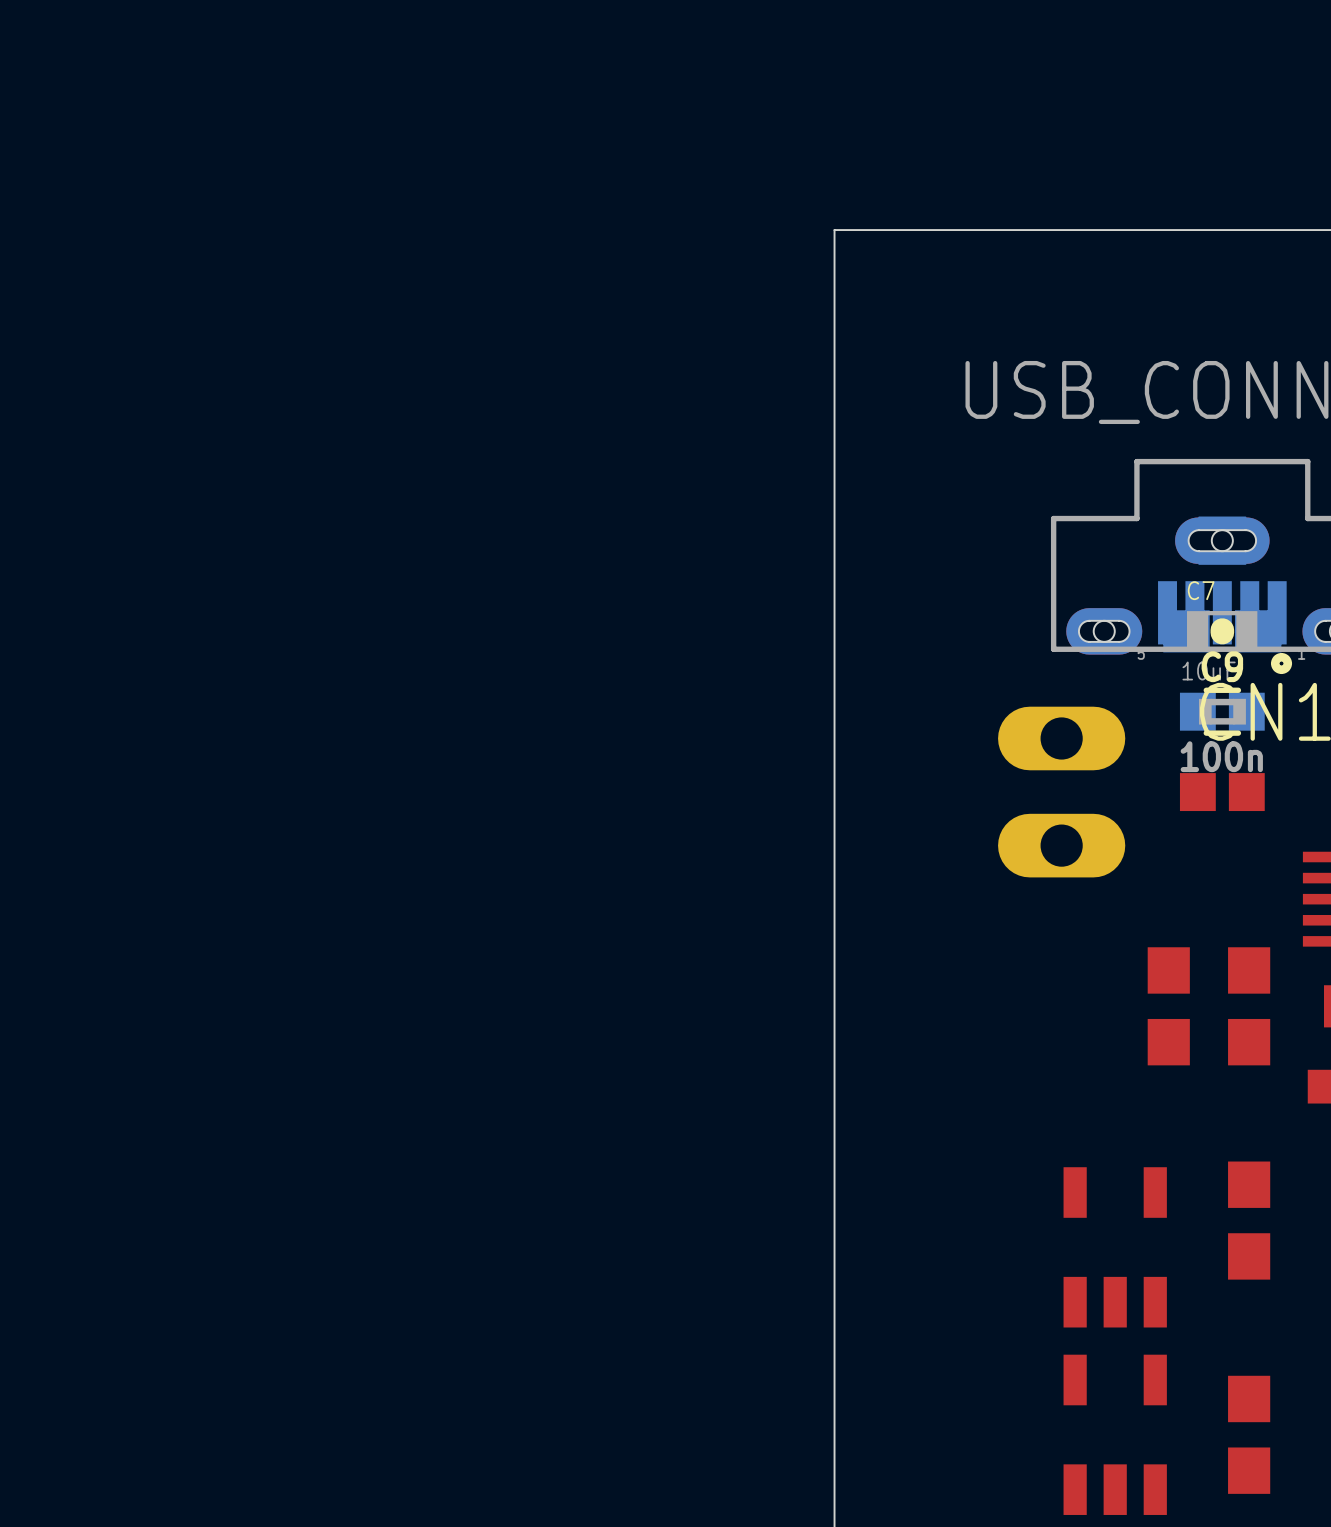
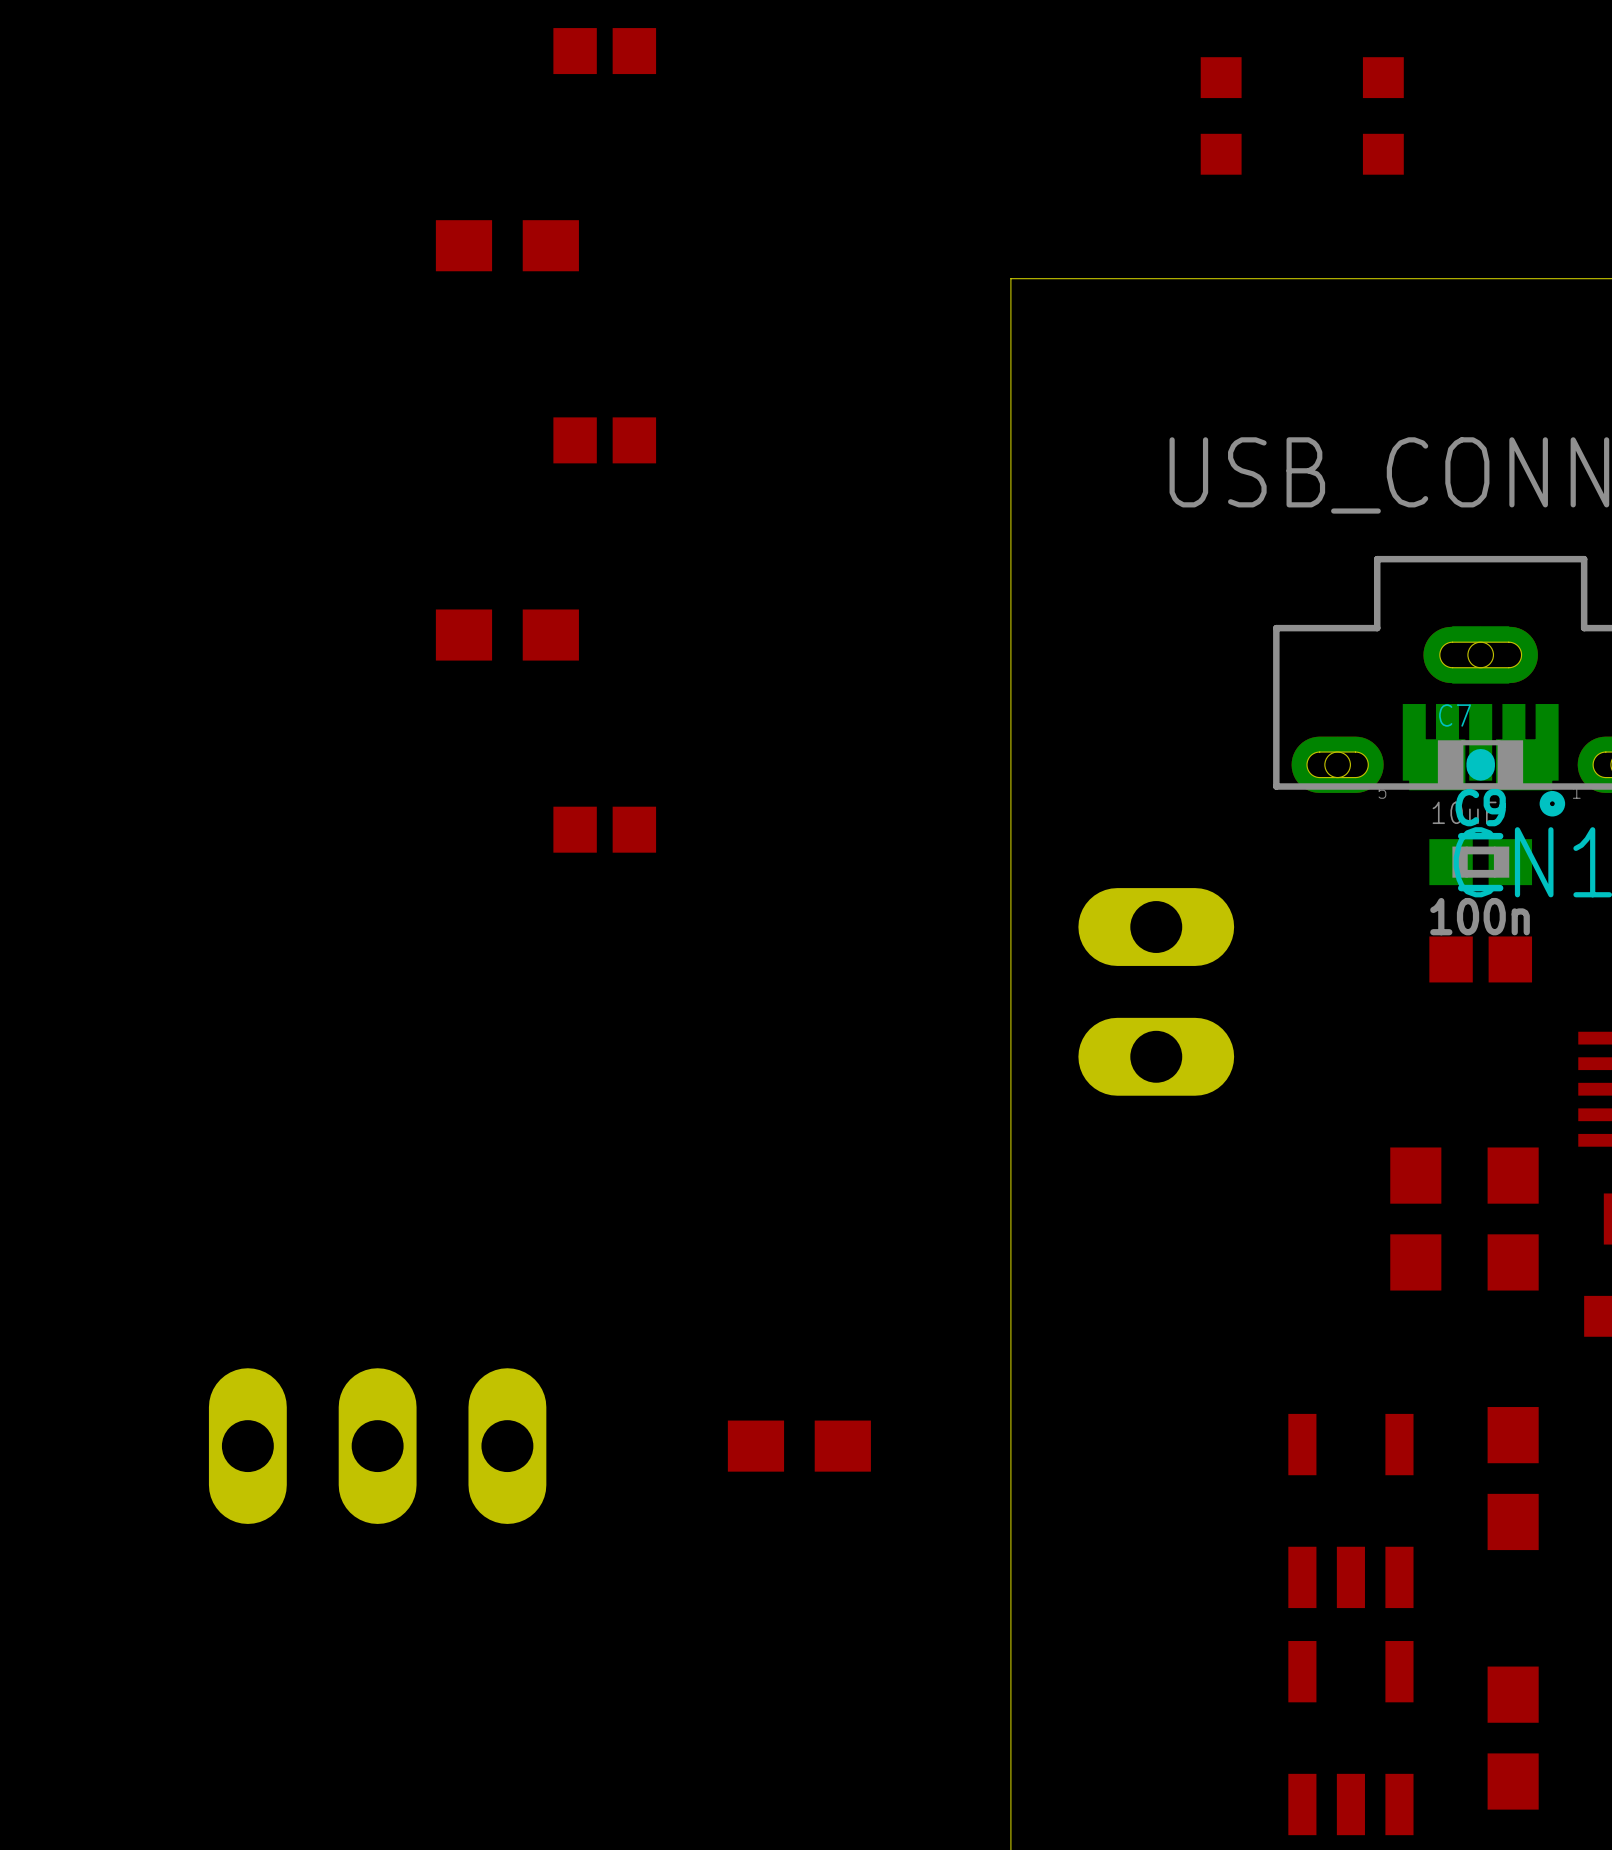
part: none -> (604, 51)
part: none -> (1221, 115)
part: none -> (1383, 115)
part: none -> (507, 245)
part: none -> (604, 440)
part: none -> (507, 635)
part: none -> (604, 829)
part: (1061, 792) -> none
part: none -> (1156, 991)
part: none -> (377, 1446)
part: none -> (799, 1446)

